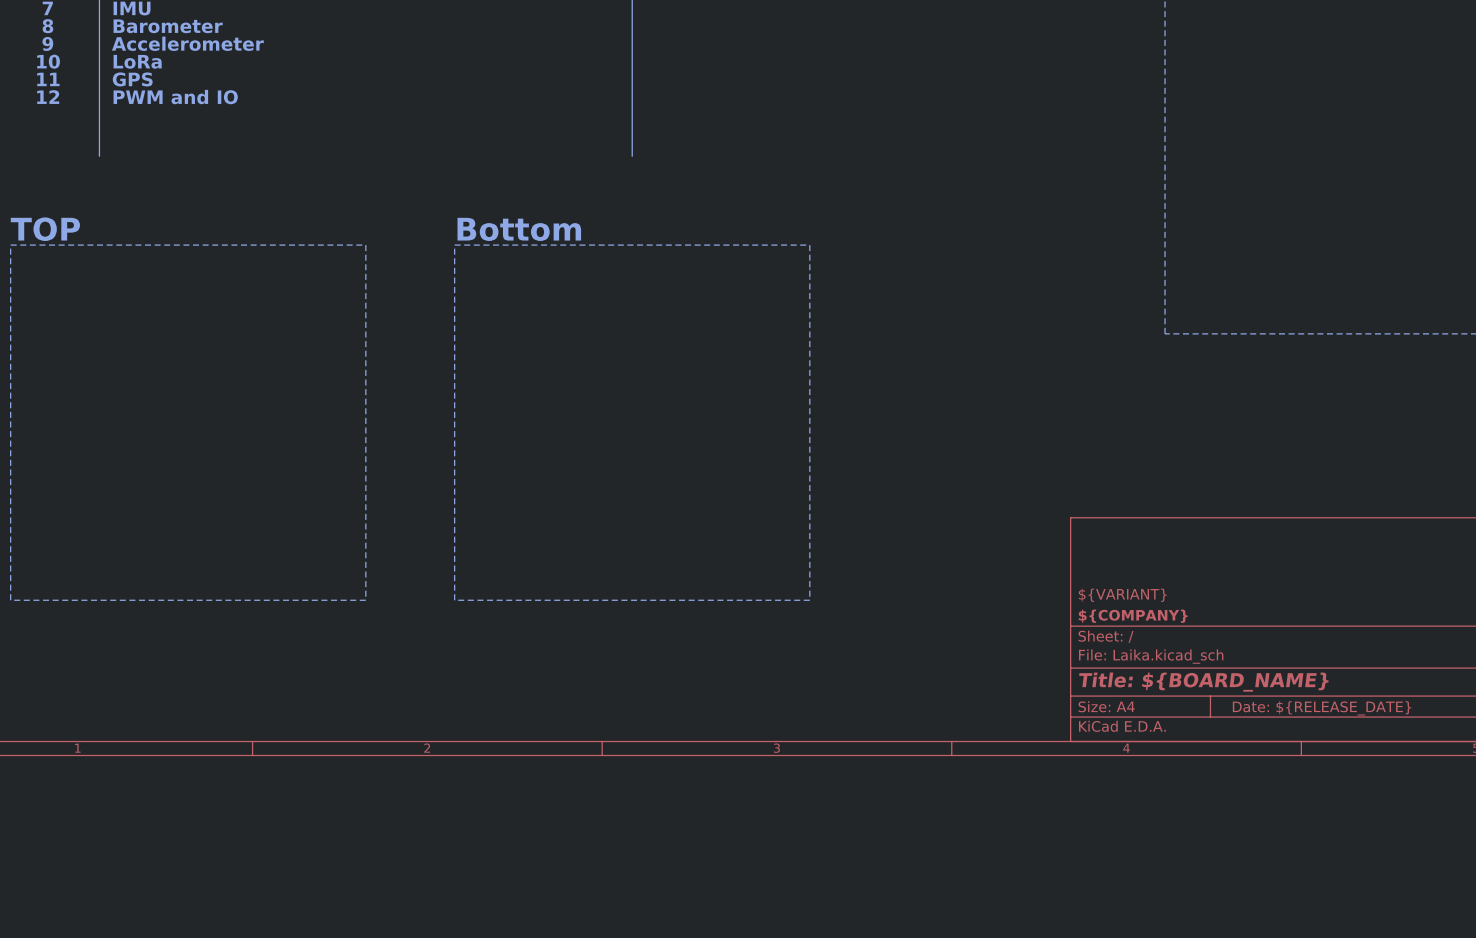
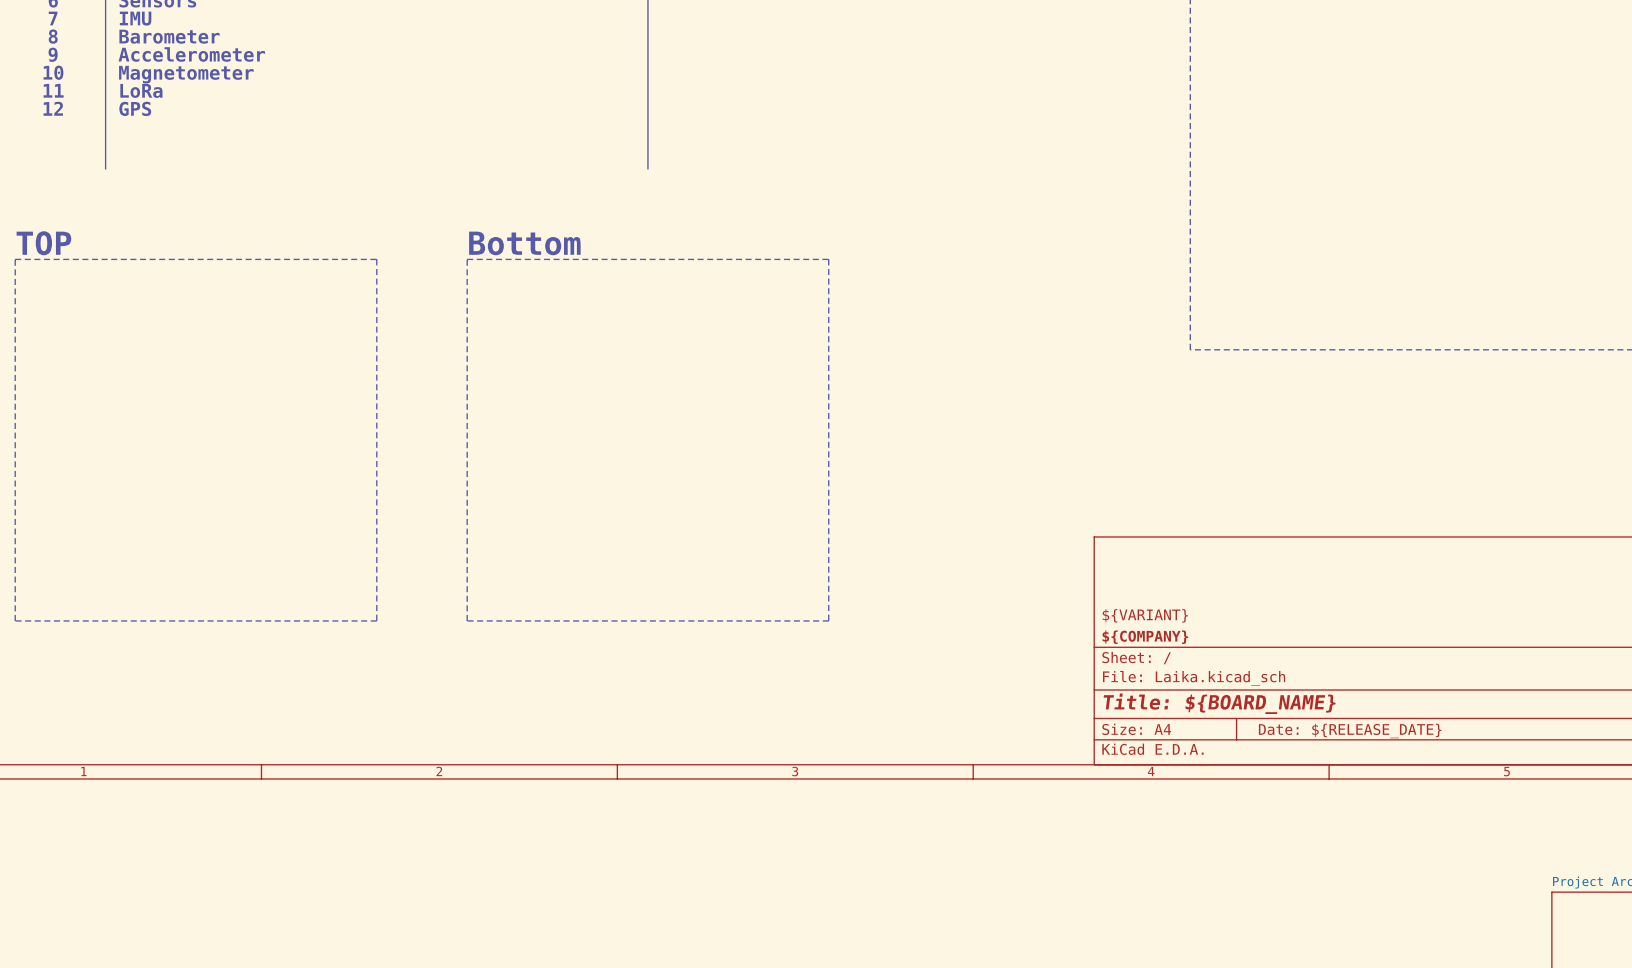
text: LoRa (137, 61) -> Magnetometer (186, 74)
text: GPS (132, 79) -> LoRa (141, 90)
text: PWM and IO (175, 97) -> GPS (135, 108)

